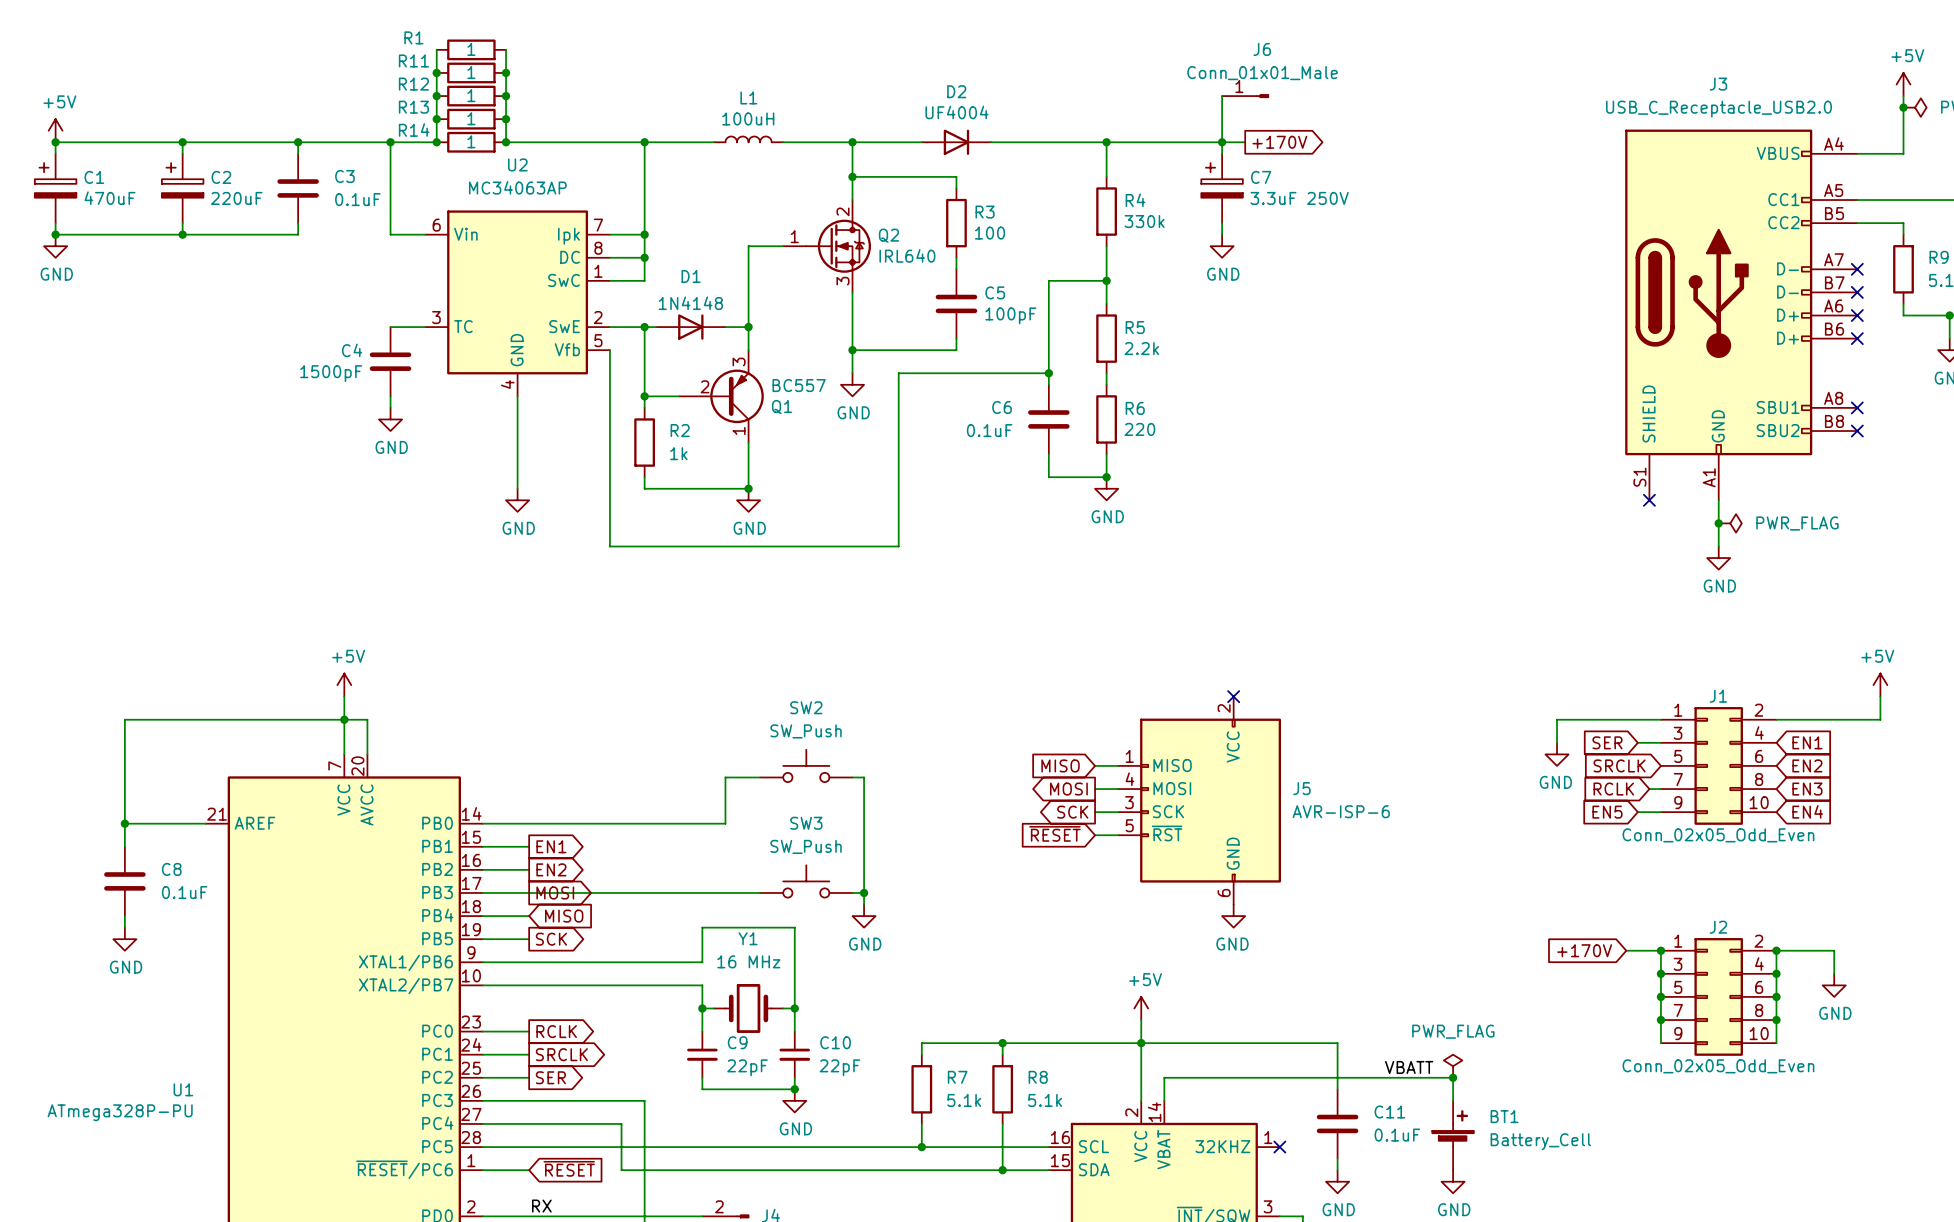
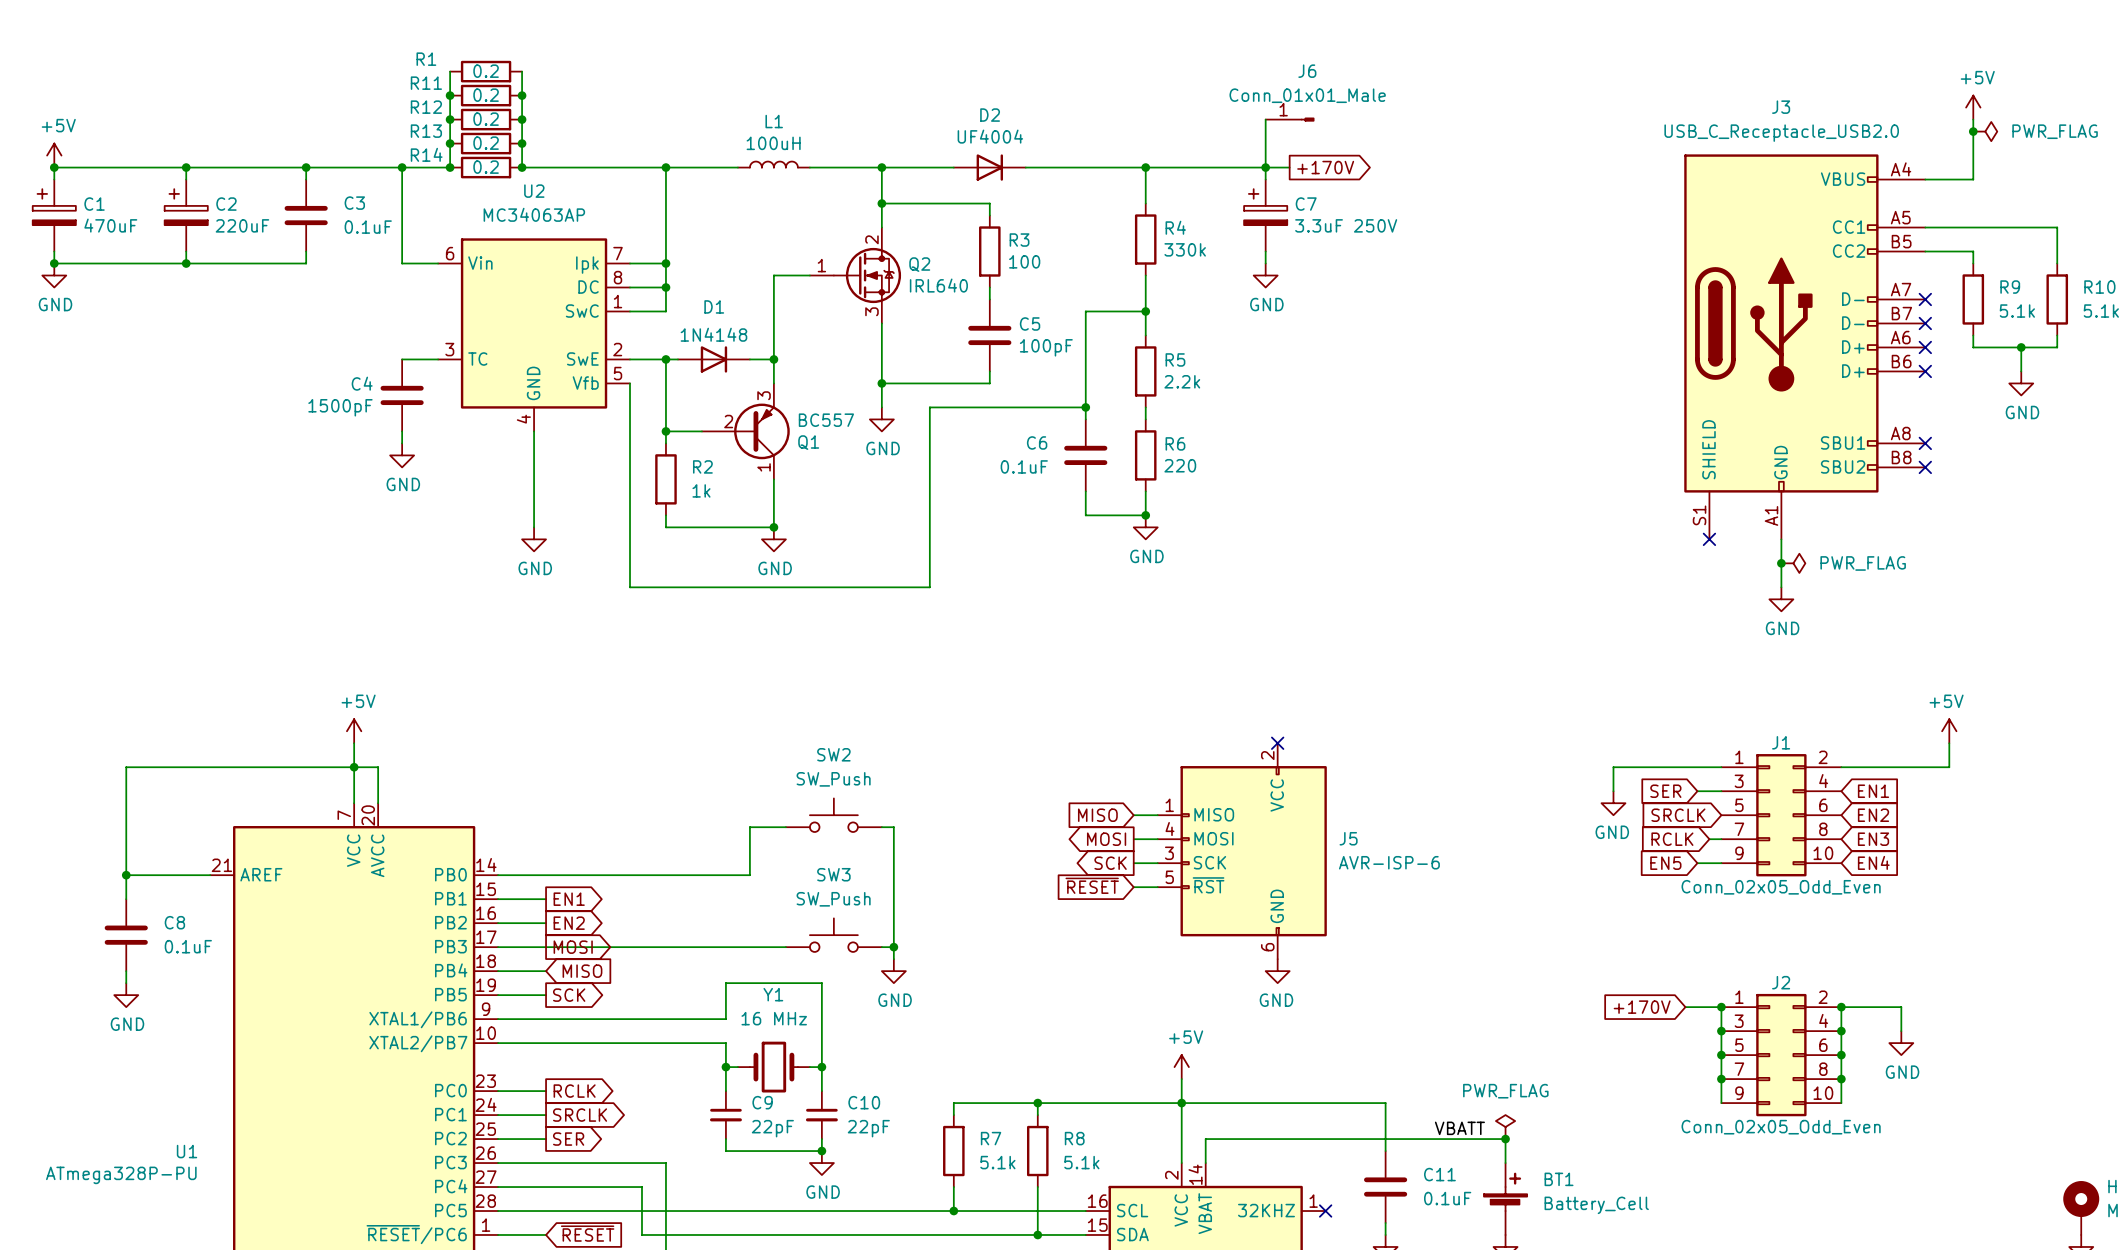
R1 value: 1 (471, 49) -> 0.2 (486, 71)
R11 value: 1 (471, 72) -> 0.2 (486, 95)
R12 value: 1 (471, 95) -> 0.2 (486, 119)
R13 value: 1 (471, 118) -> 0.2 (486, 143)
R14 value: 1 (471, 141) -> 0.2 (486, 167)

